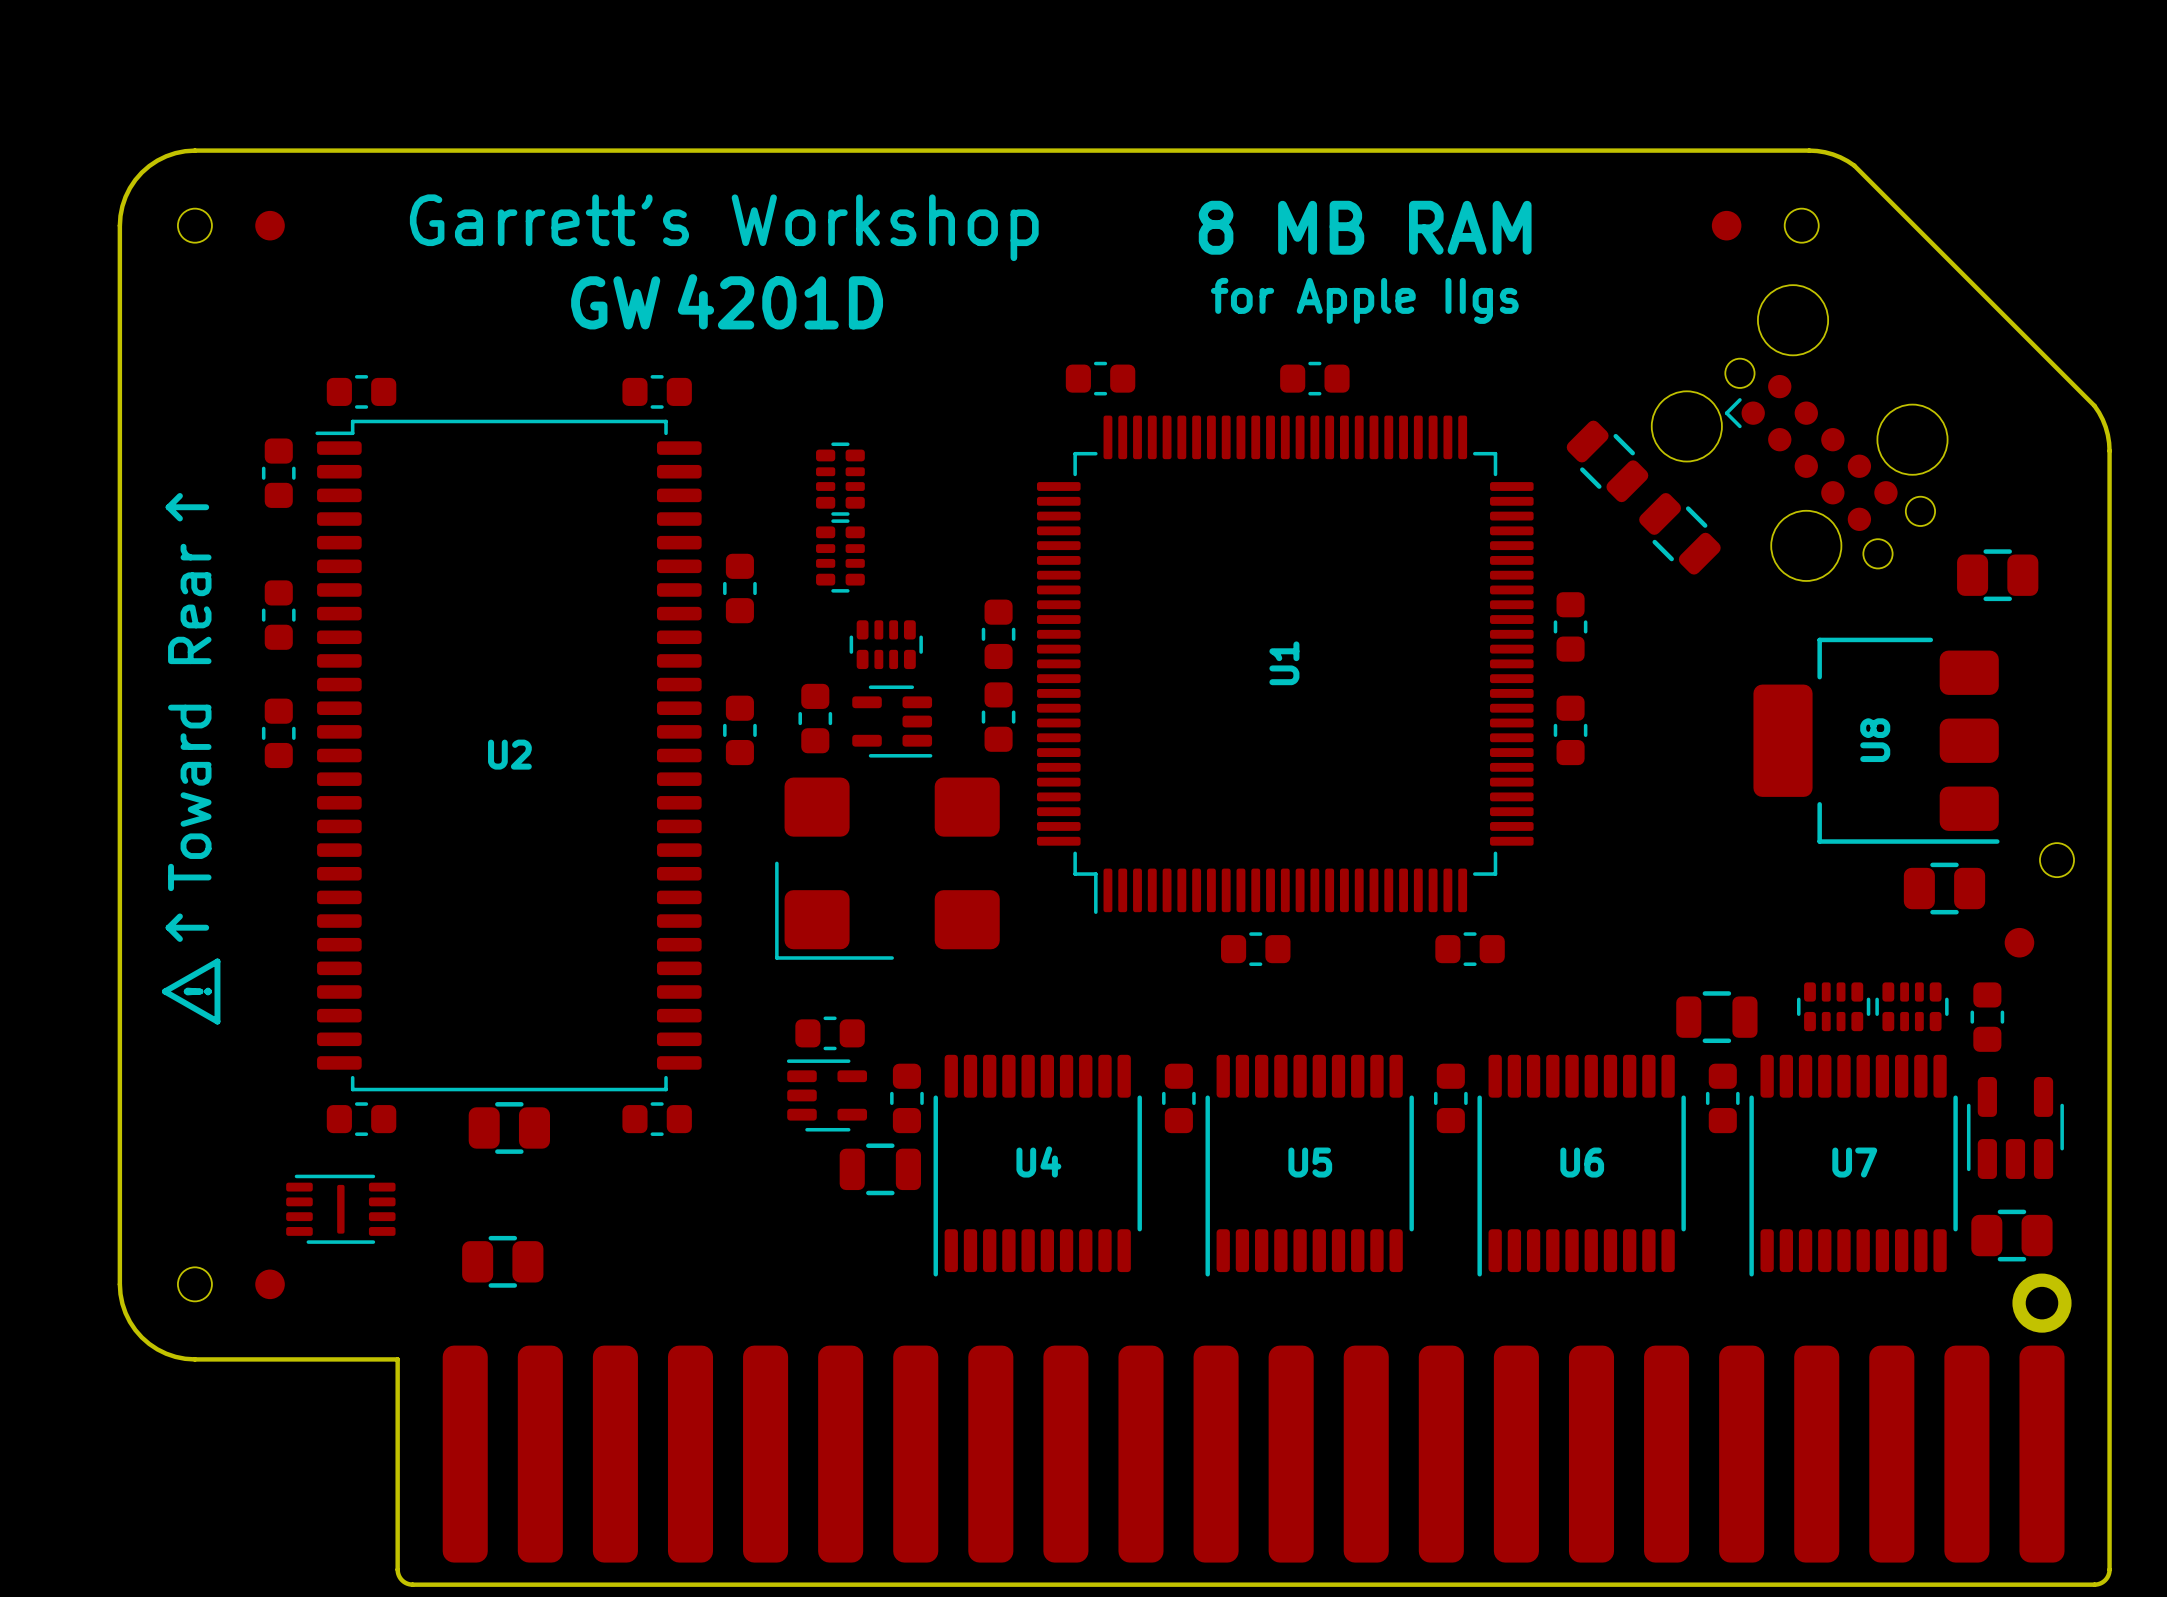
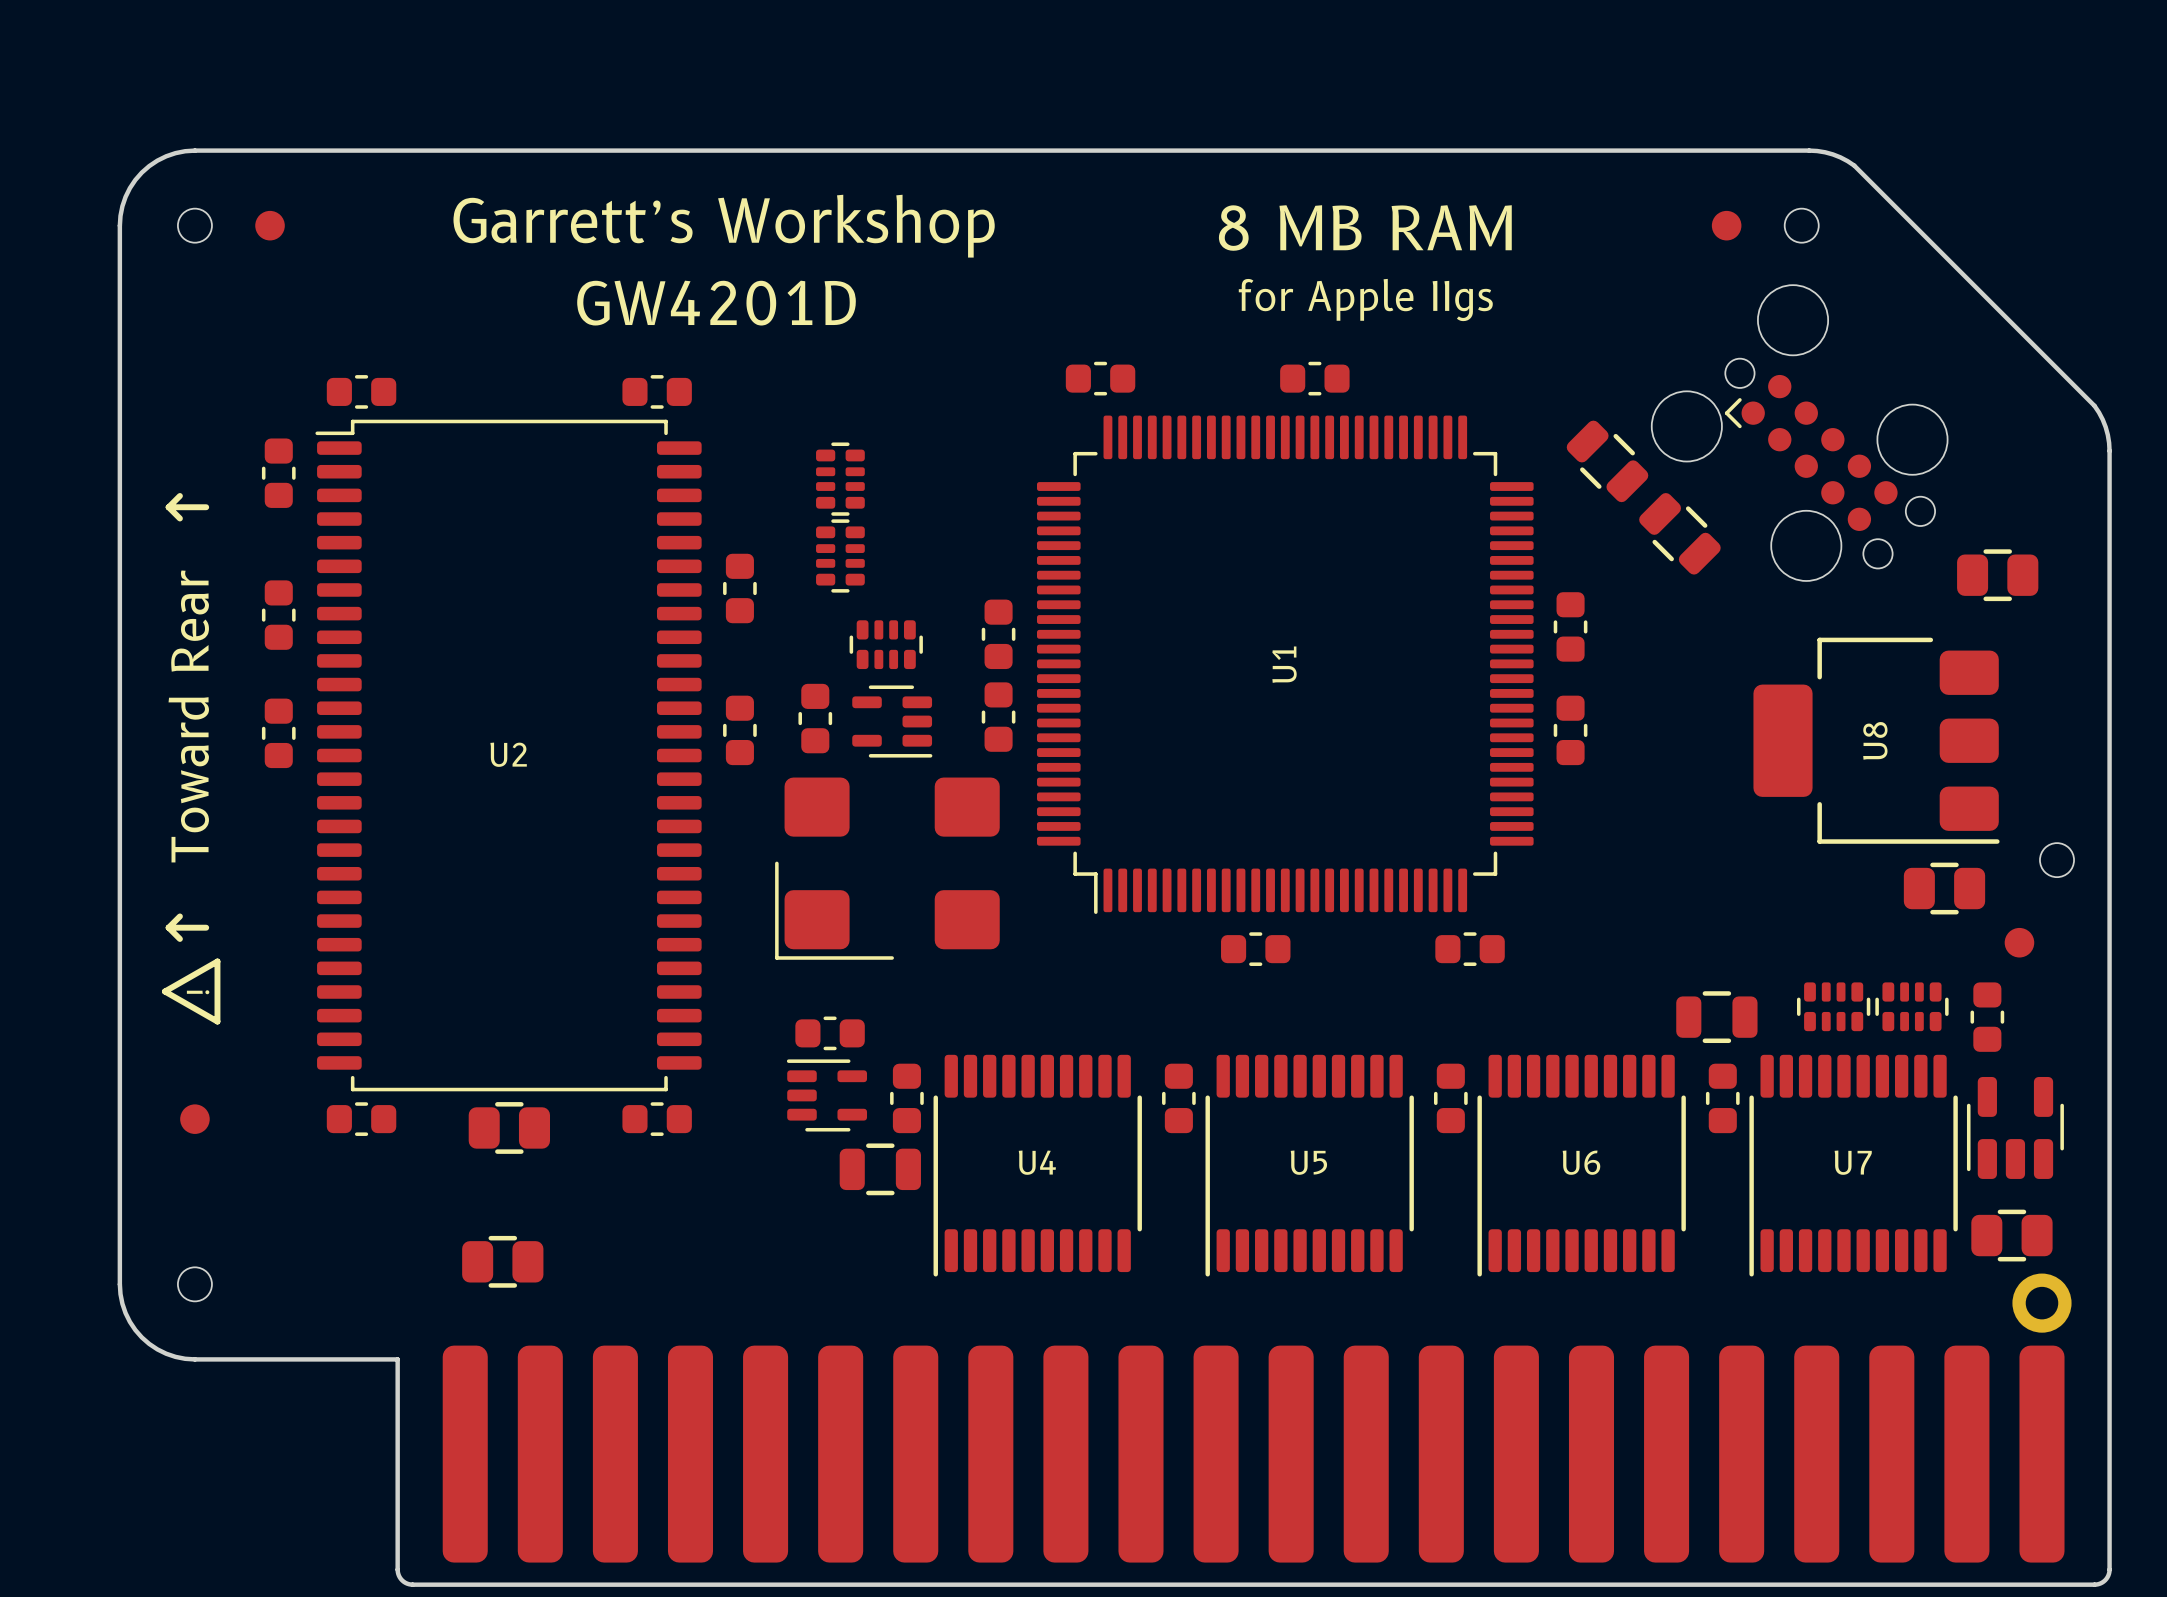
part: (340, 1209) -> none
part position: (270, 1284) -> (194, 1119)

